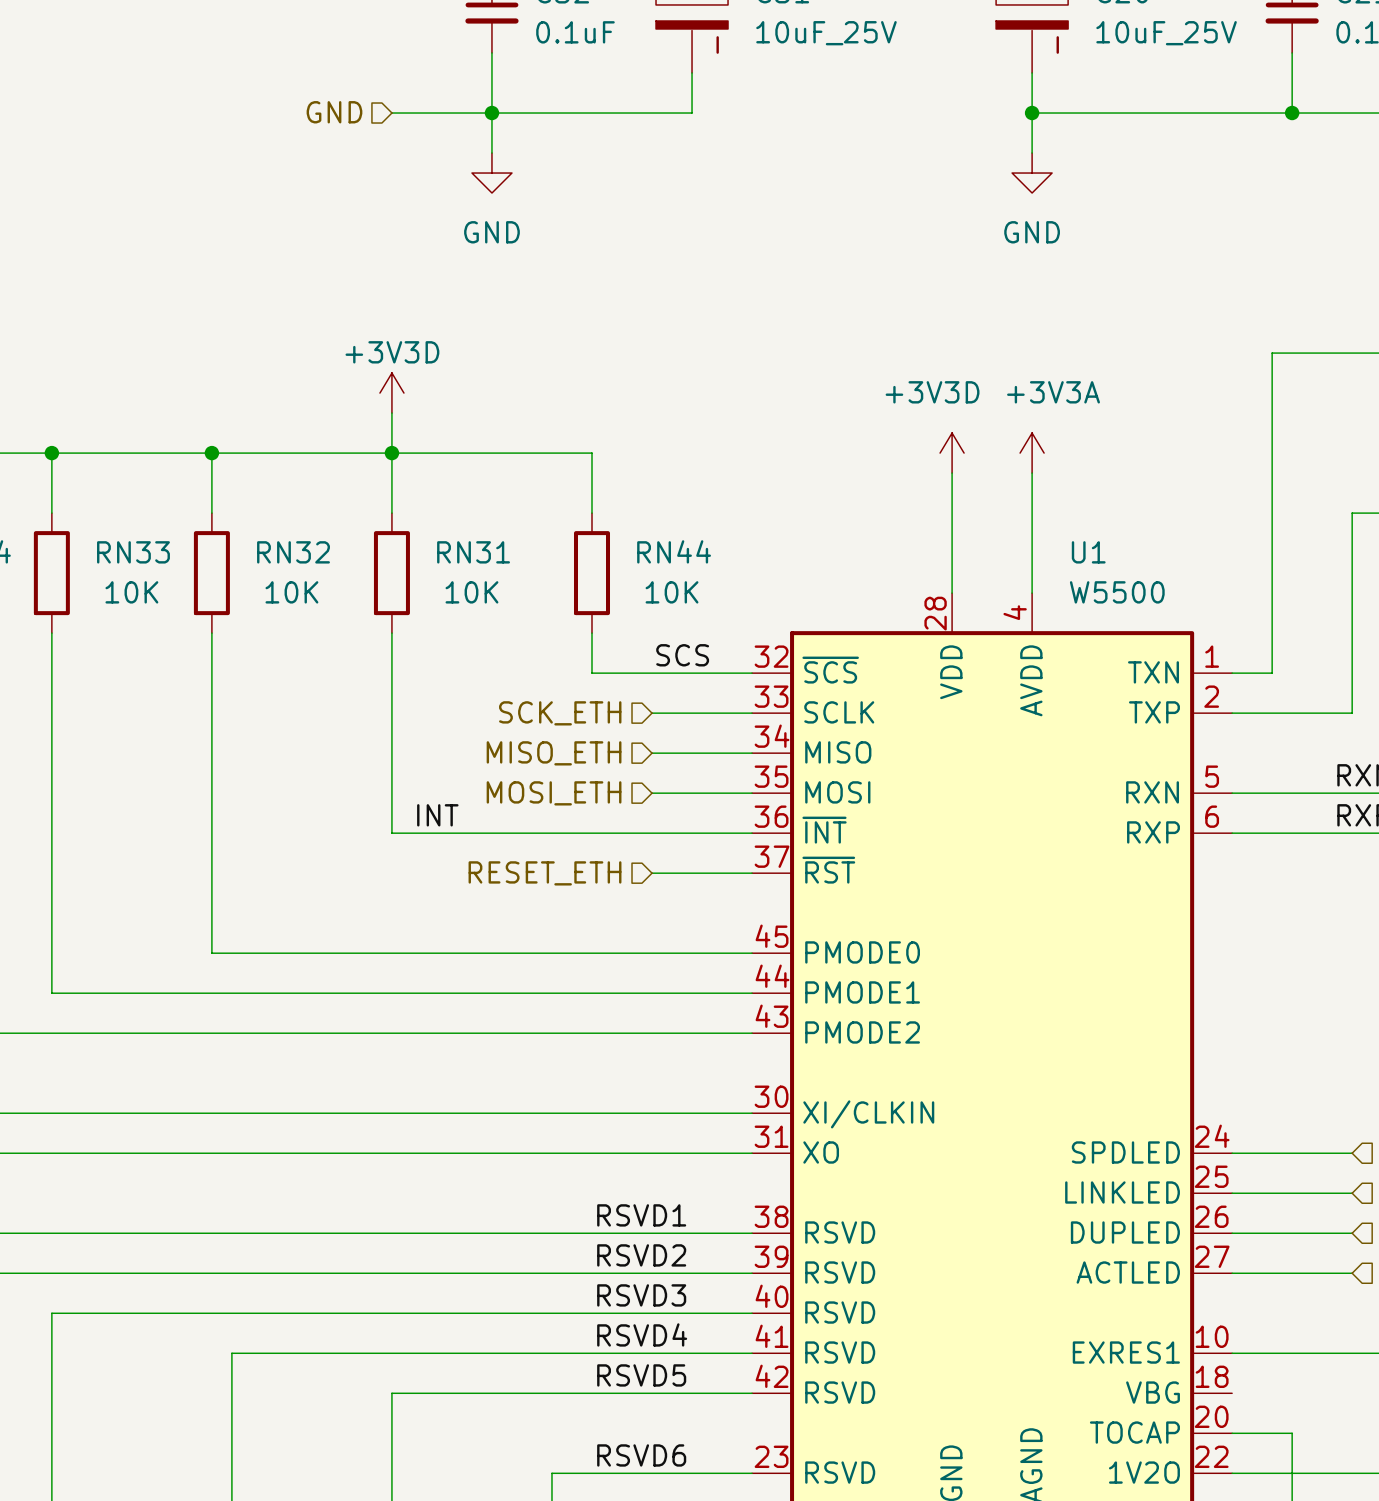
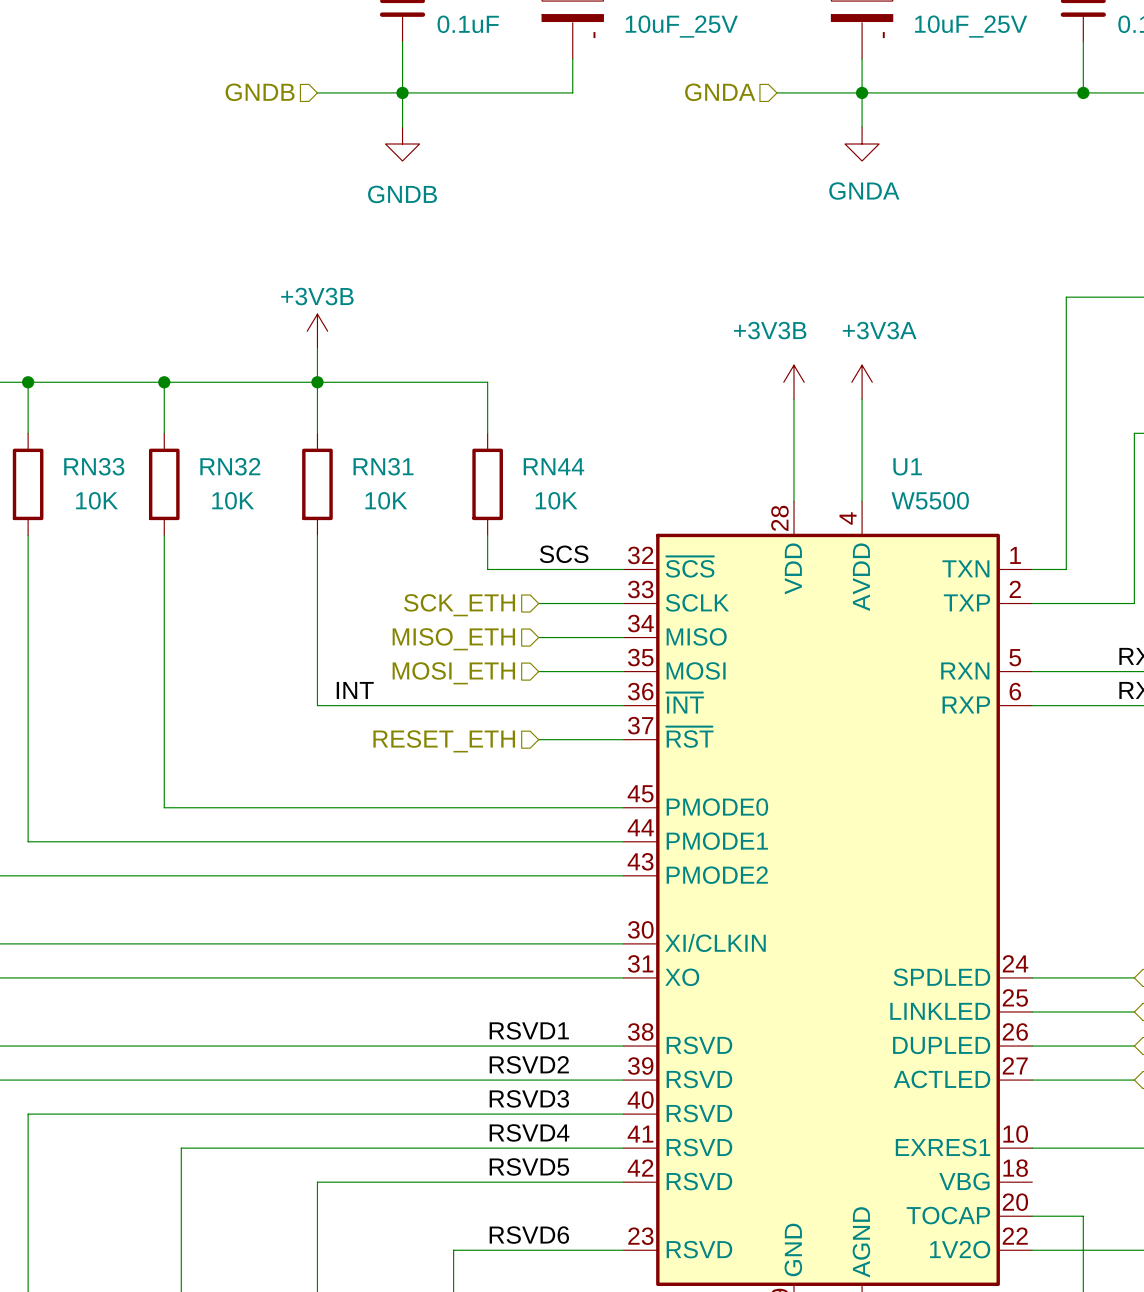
hierarchical label: GND (334, 112) -> GNDB (260, 92)
hierarchical label: none -> GNDA (720, 92)
wire: none -> (776, 92) (862, 92)
power symbol: GND (491, 173) -> GNDB (402, 144)
power symbol: GND (1032, 173) -> GNDA (862, 144)
power symbol: +3V3D (391, 393) -> +3V3B (317, 331)
power symbol: +3V3D (952, 453) -> +3V3B (793, 382)

